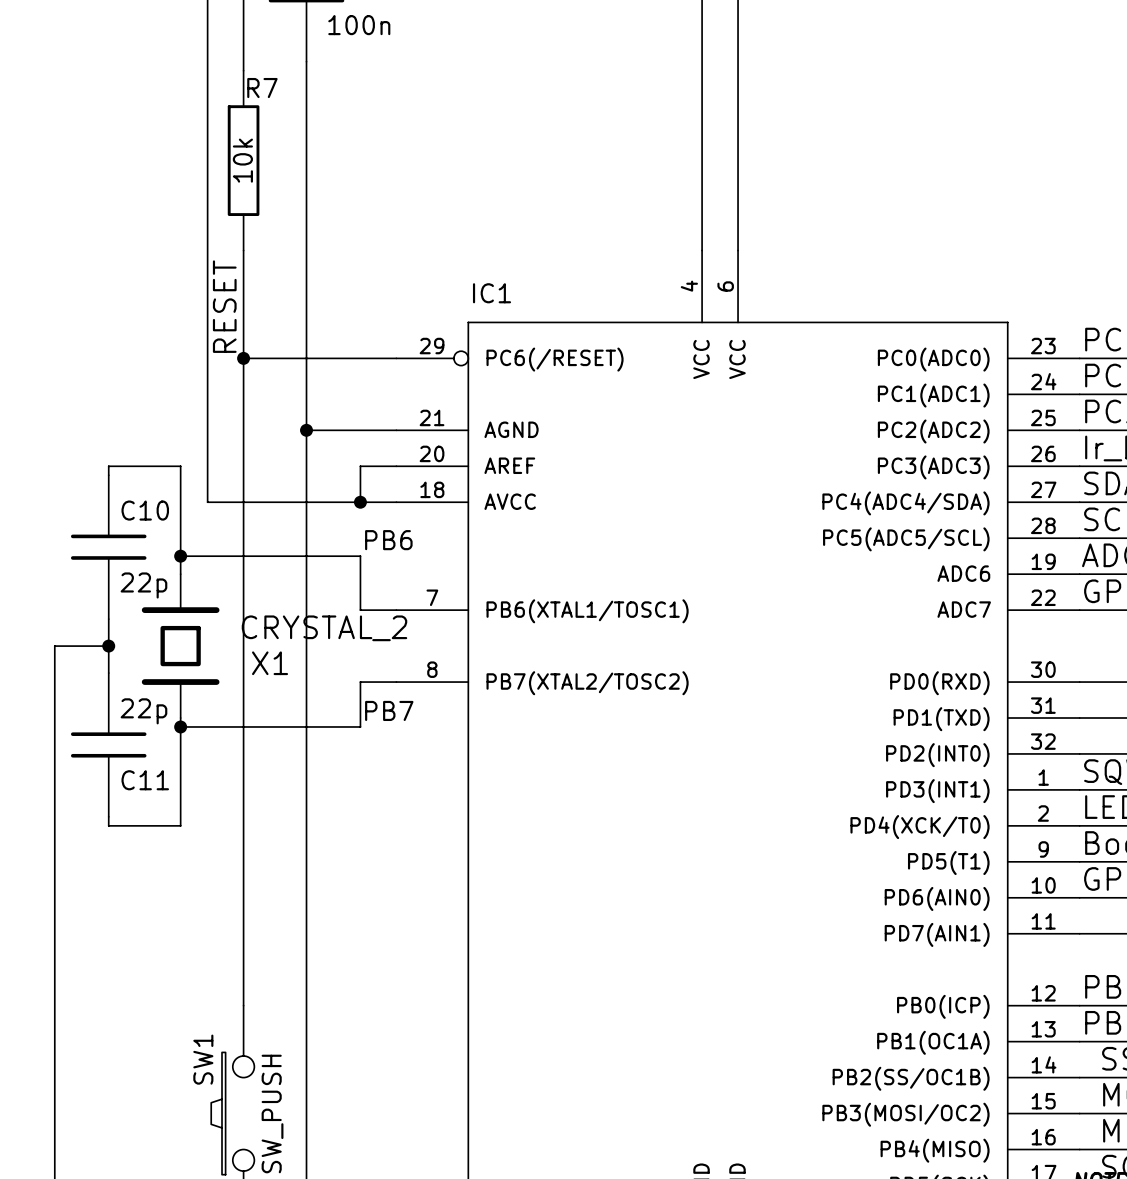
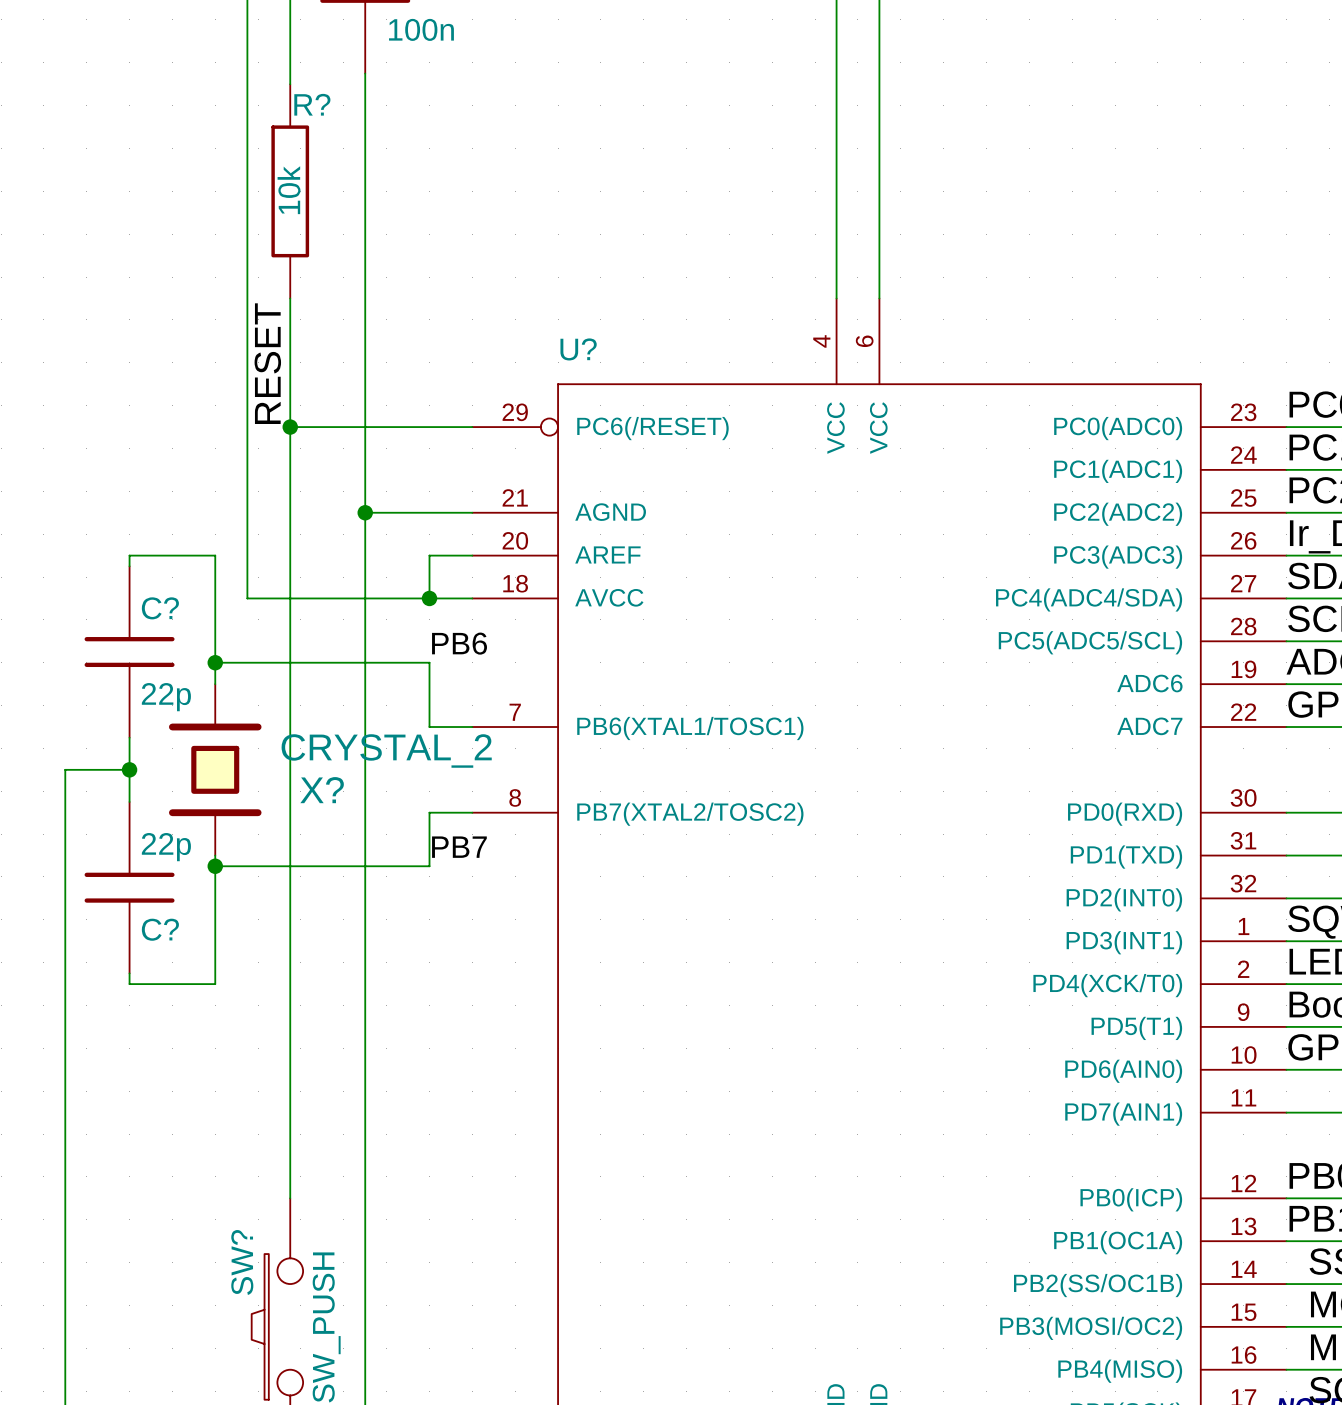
R7 name: R7 (262, 88) -> R? (312, 104)
IC1 name: IC1 (492, 293) -> U? (578, 349)
C10 name: C10 (145, 510) -> C? (160, 608)
X1 name: X1 (270, 663) -> X? (322, 790)
C11 name: C11 (145, 780) -> C? (160, 929)
SW1 name: SW1 (203, 1059) -> SW? (242, 1262)

